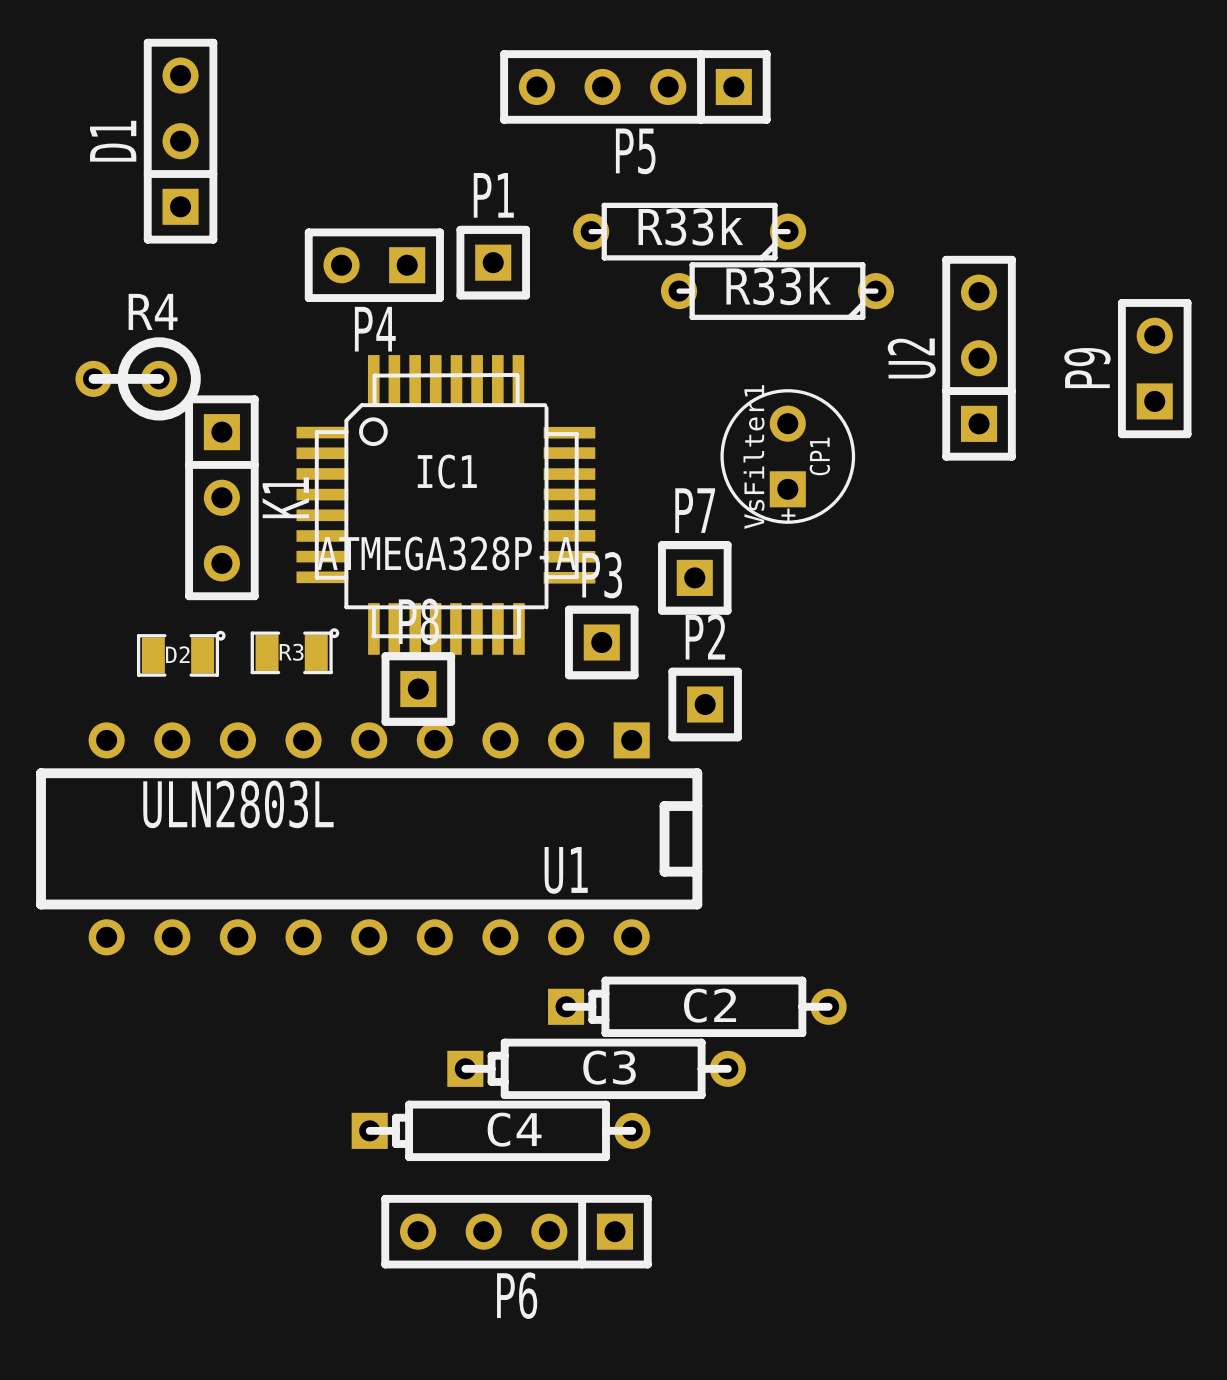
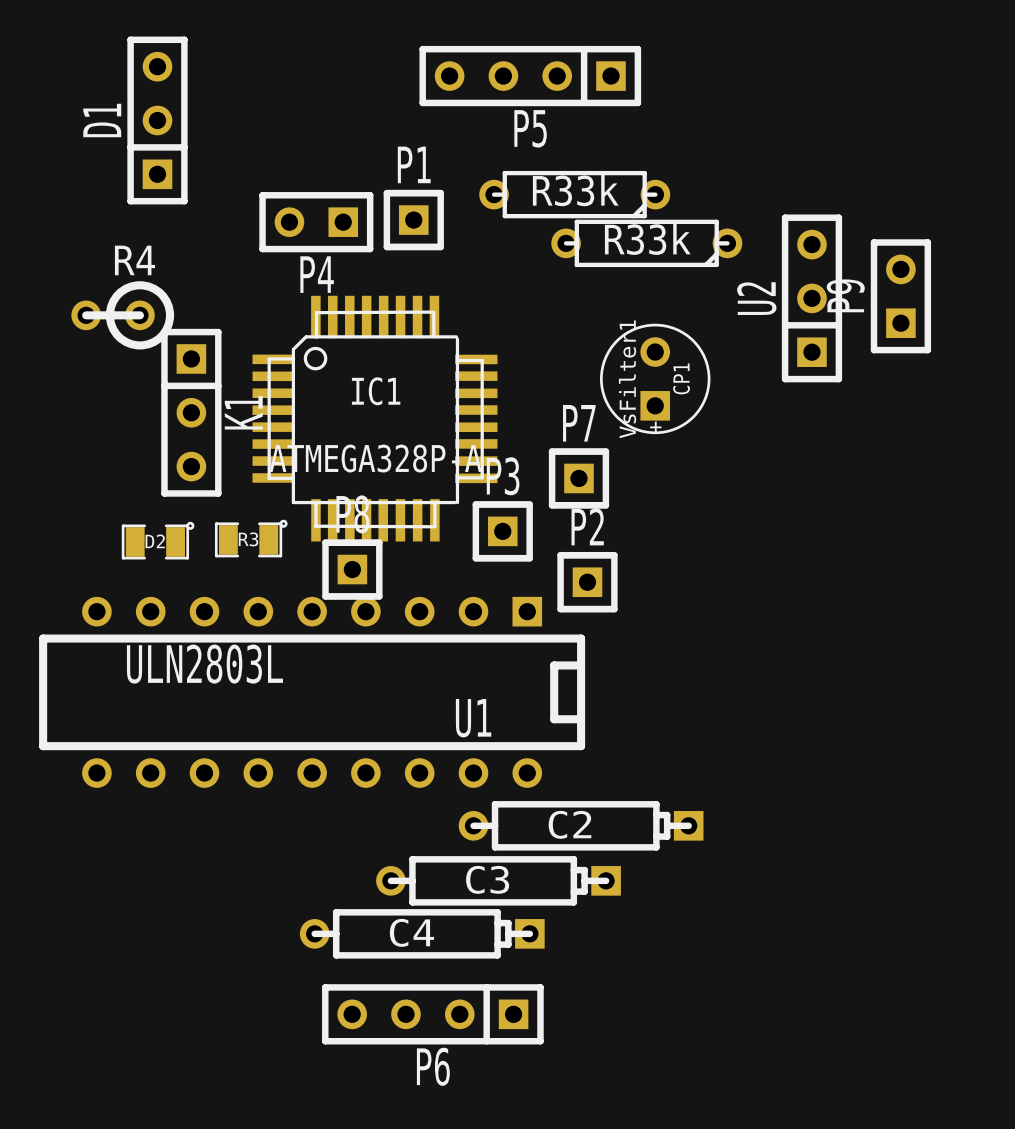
P9 position: (1154, 368) -> (900, 296)
C2 rotation: 0° (697, 1006) -> 180° (581, 825)
C3 rotation: 0° (596, 1068) -> 180° (498, 880)
C4 rotation: 0° (500, 1130) -> 180° (422, 933)

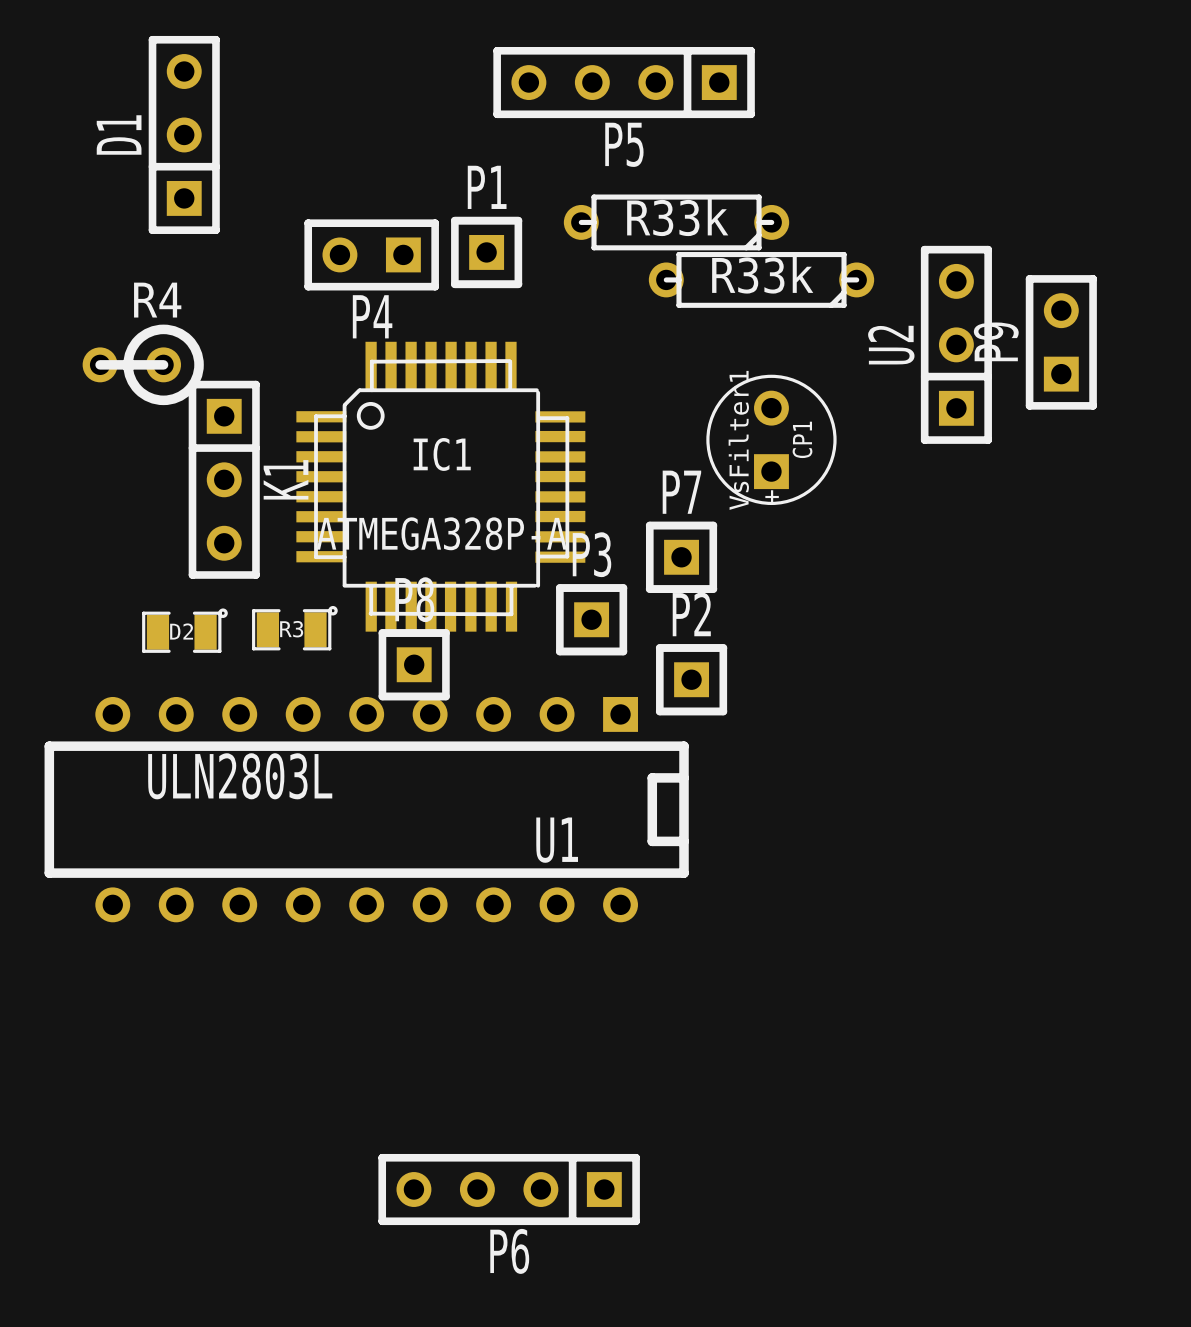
C2: (581, 825) -> none
C3: (498, 880) -> none
C4: (422, 933) -> none

